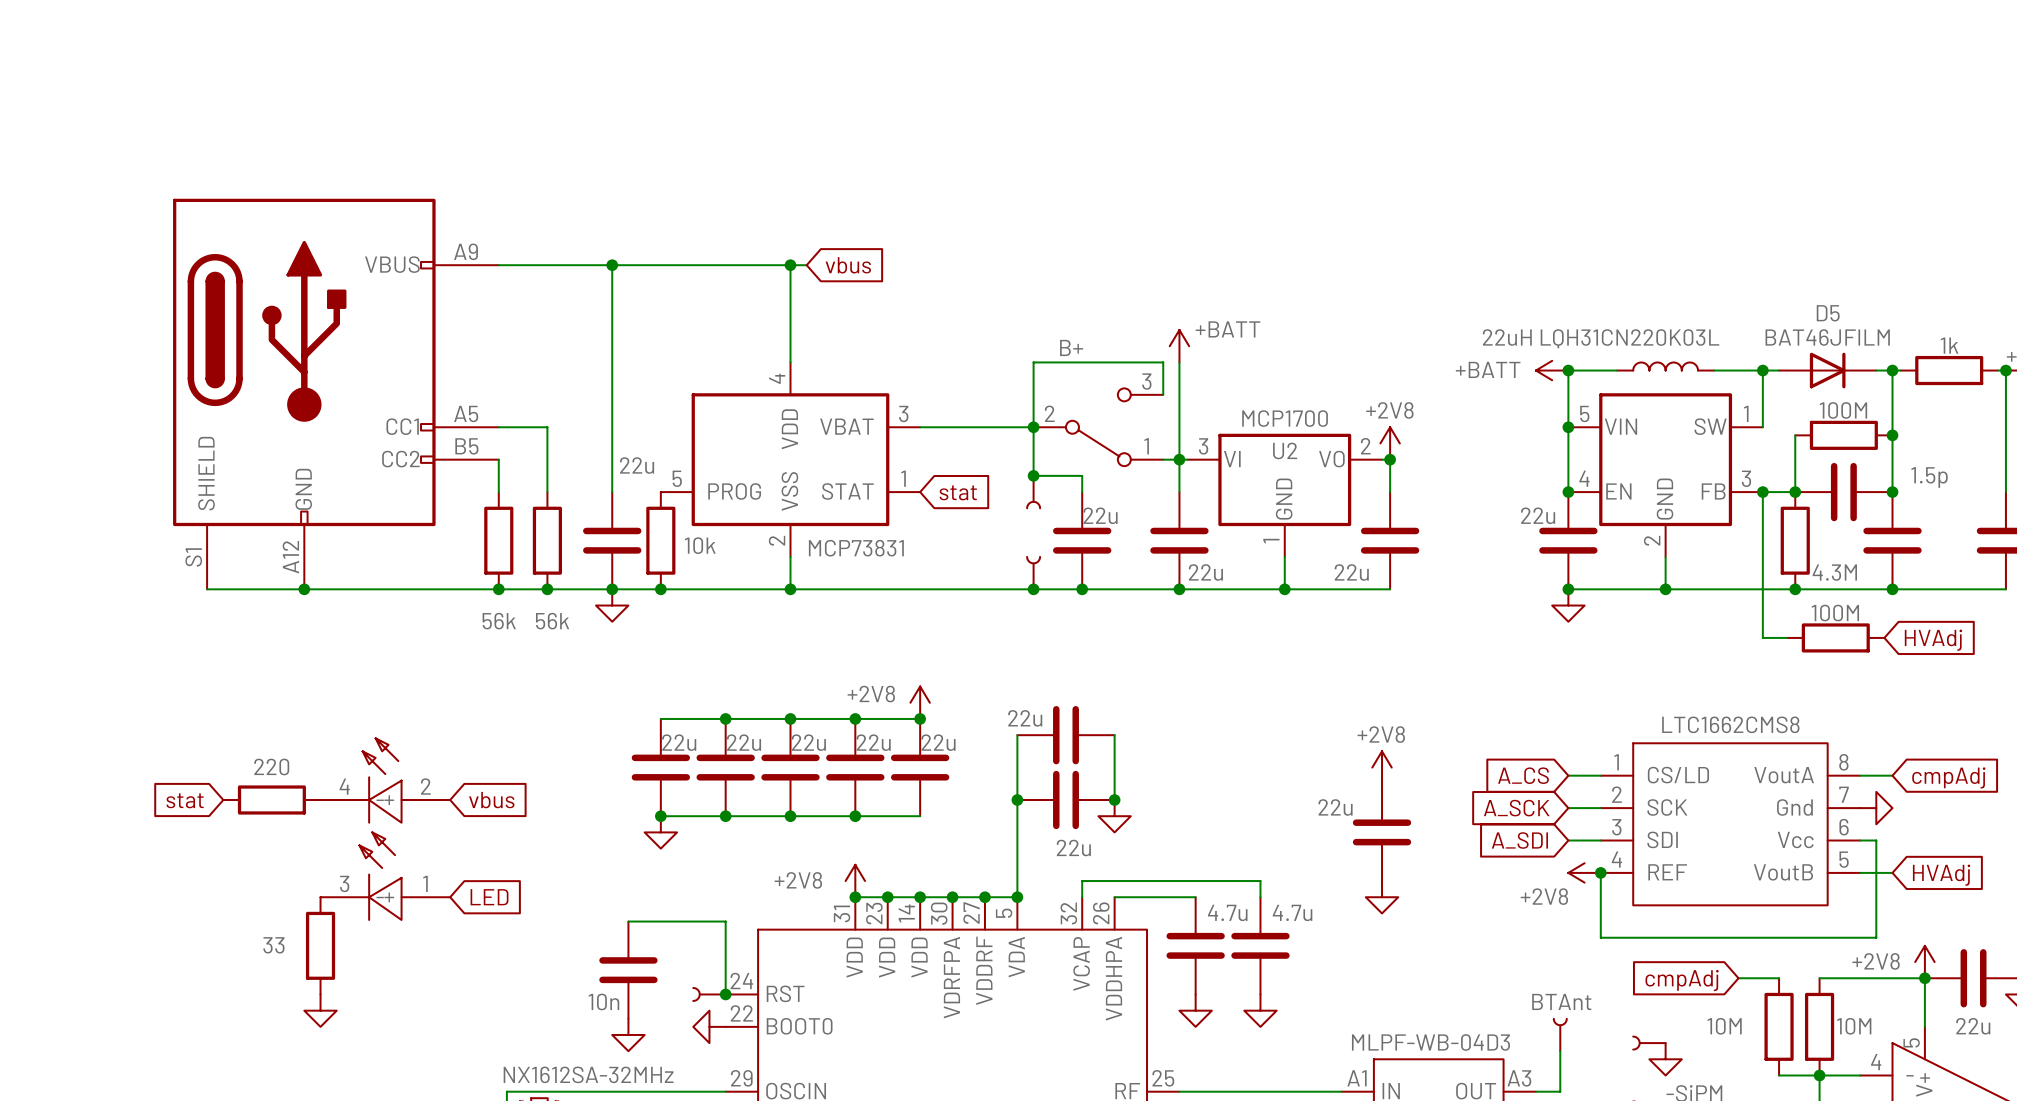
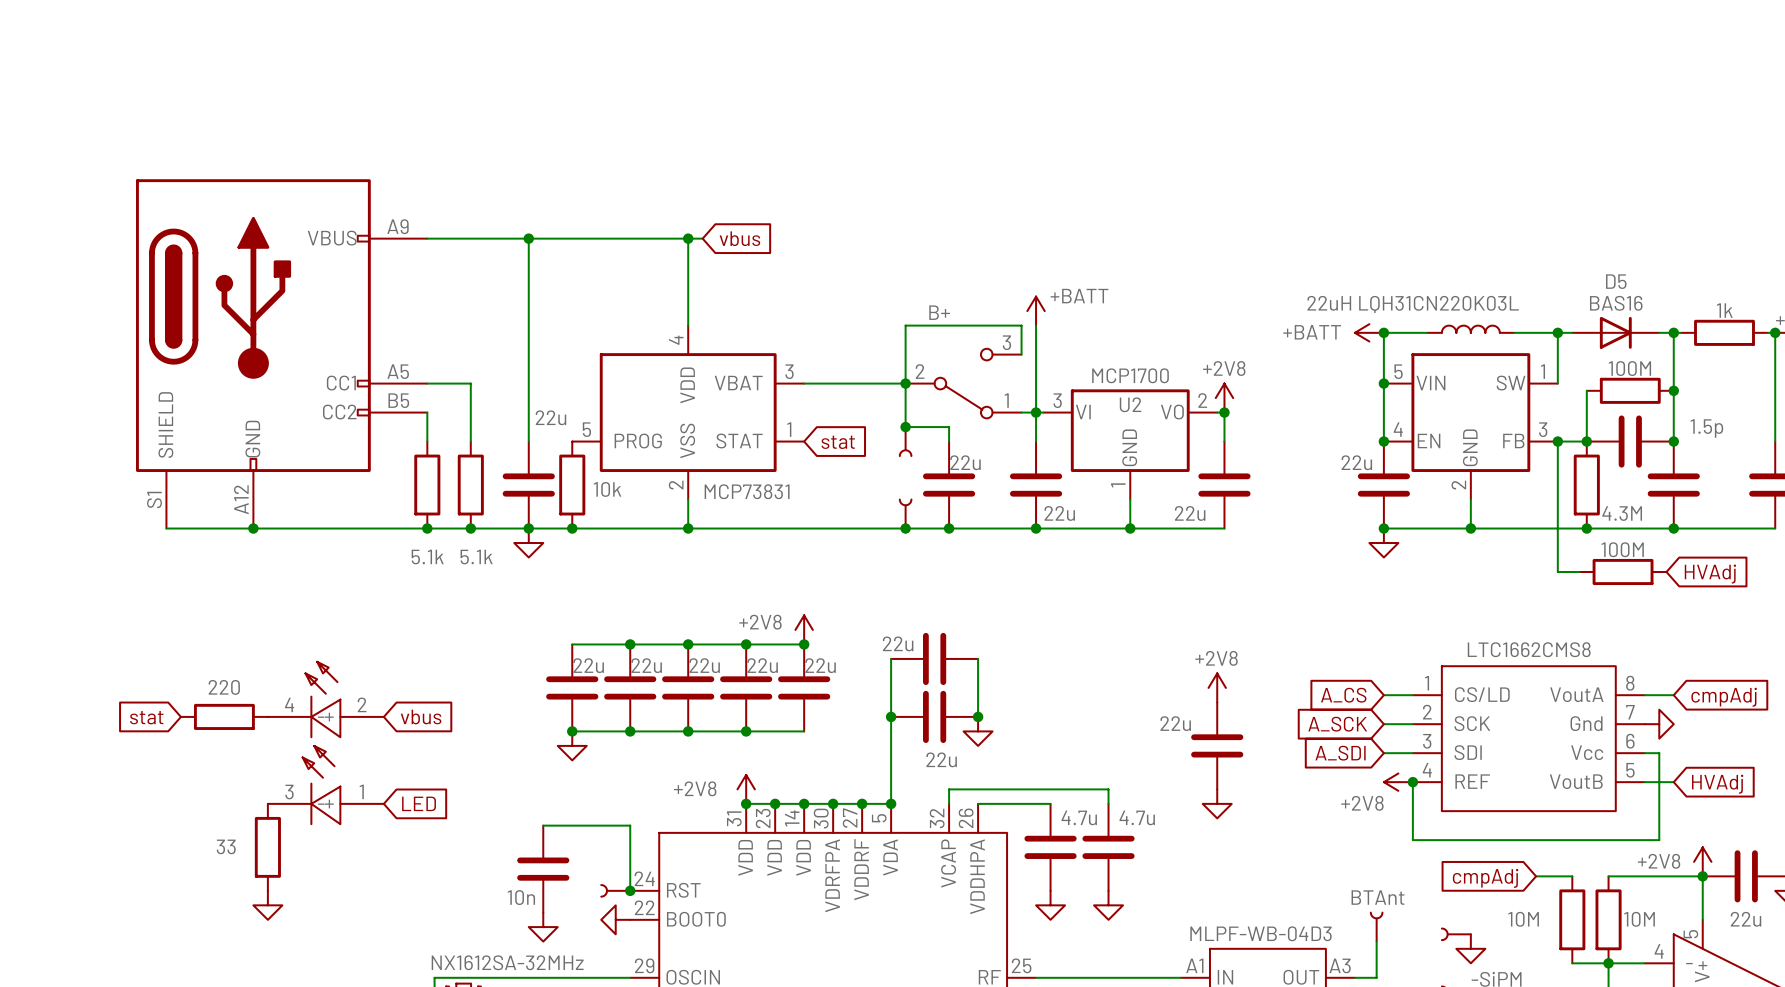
D5 value: BAT46JFILM (1827, 337) -> BAS16 (1616, 303)
part value: 56k (499, 621) -> 5.1k (427, 557)
part value: 56k (552, 621) -> 5.1k (476, 557)

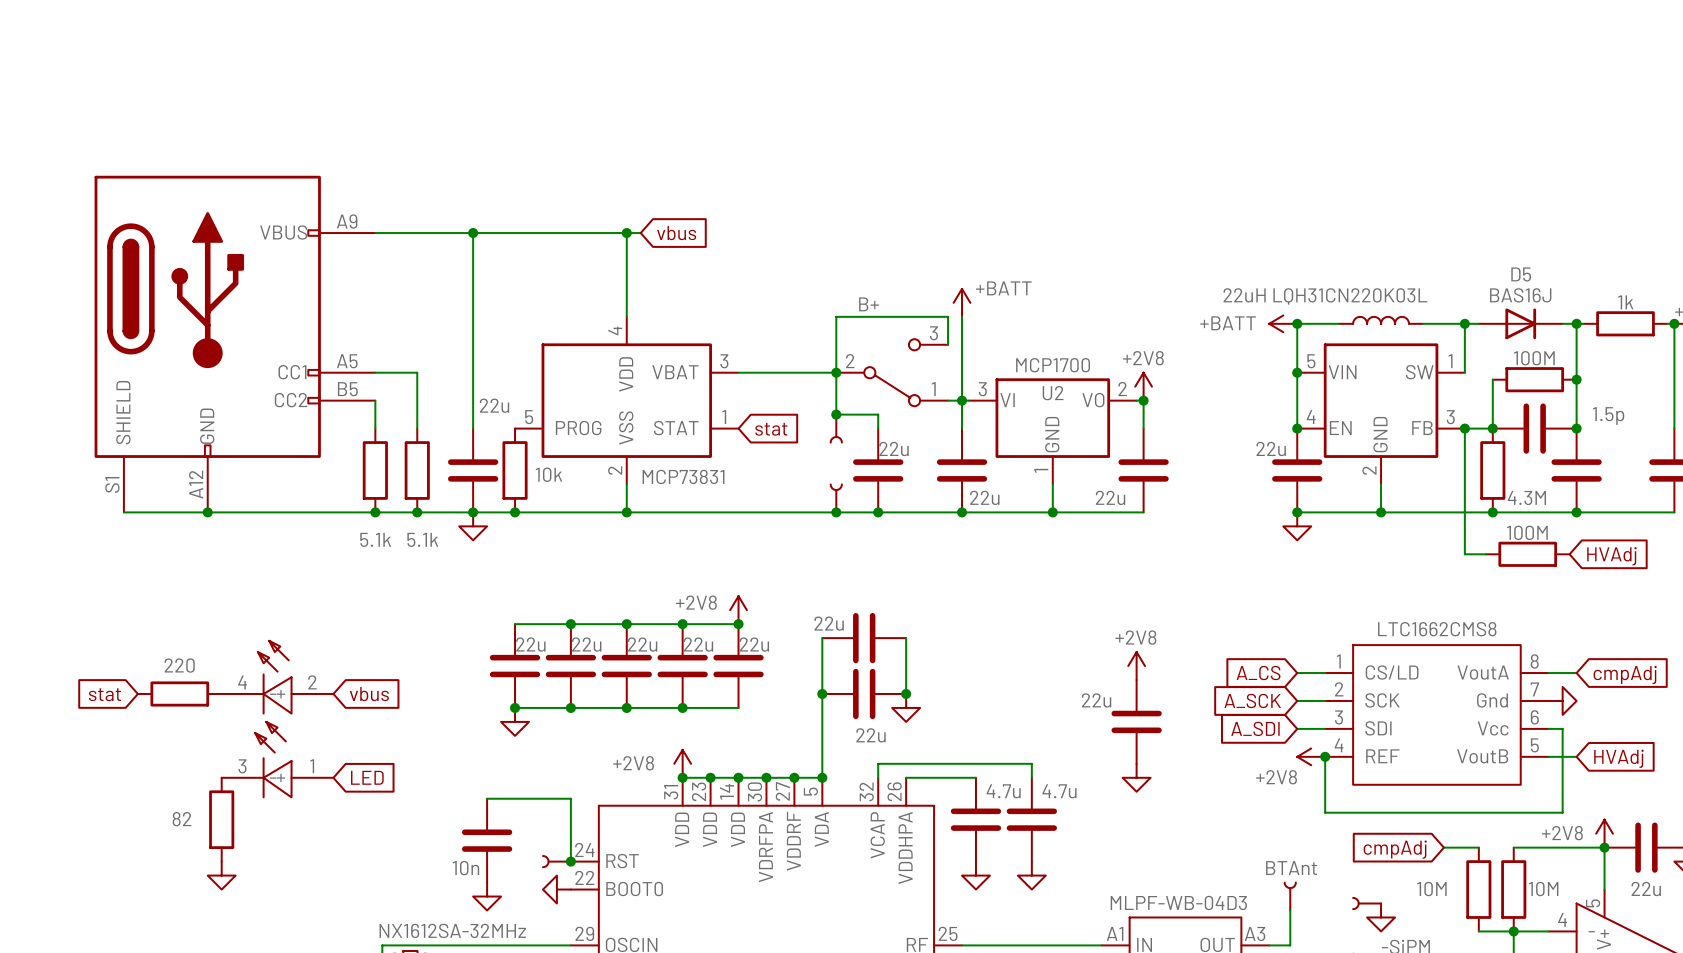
D5 value: BAS16 (1616, 303) -> BAS16J (1520, 295)
part value: 33 (226, 846) -> 82 (181, 819)

